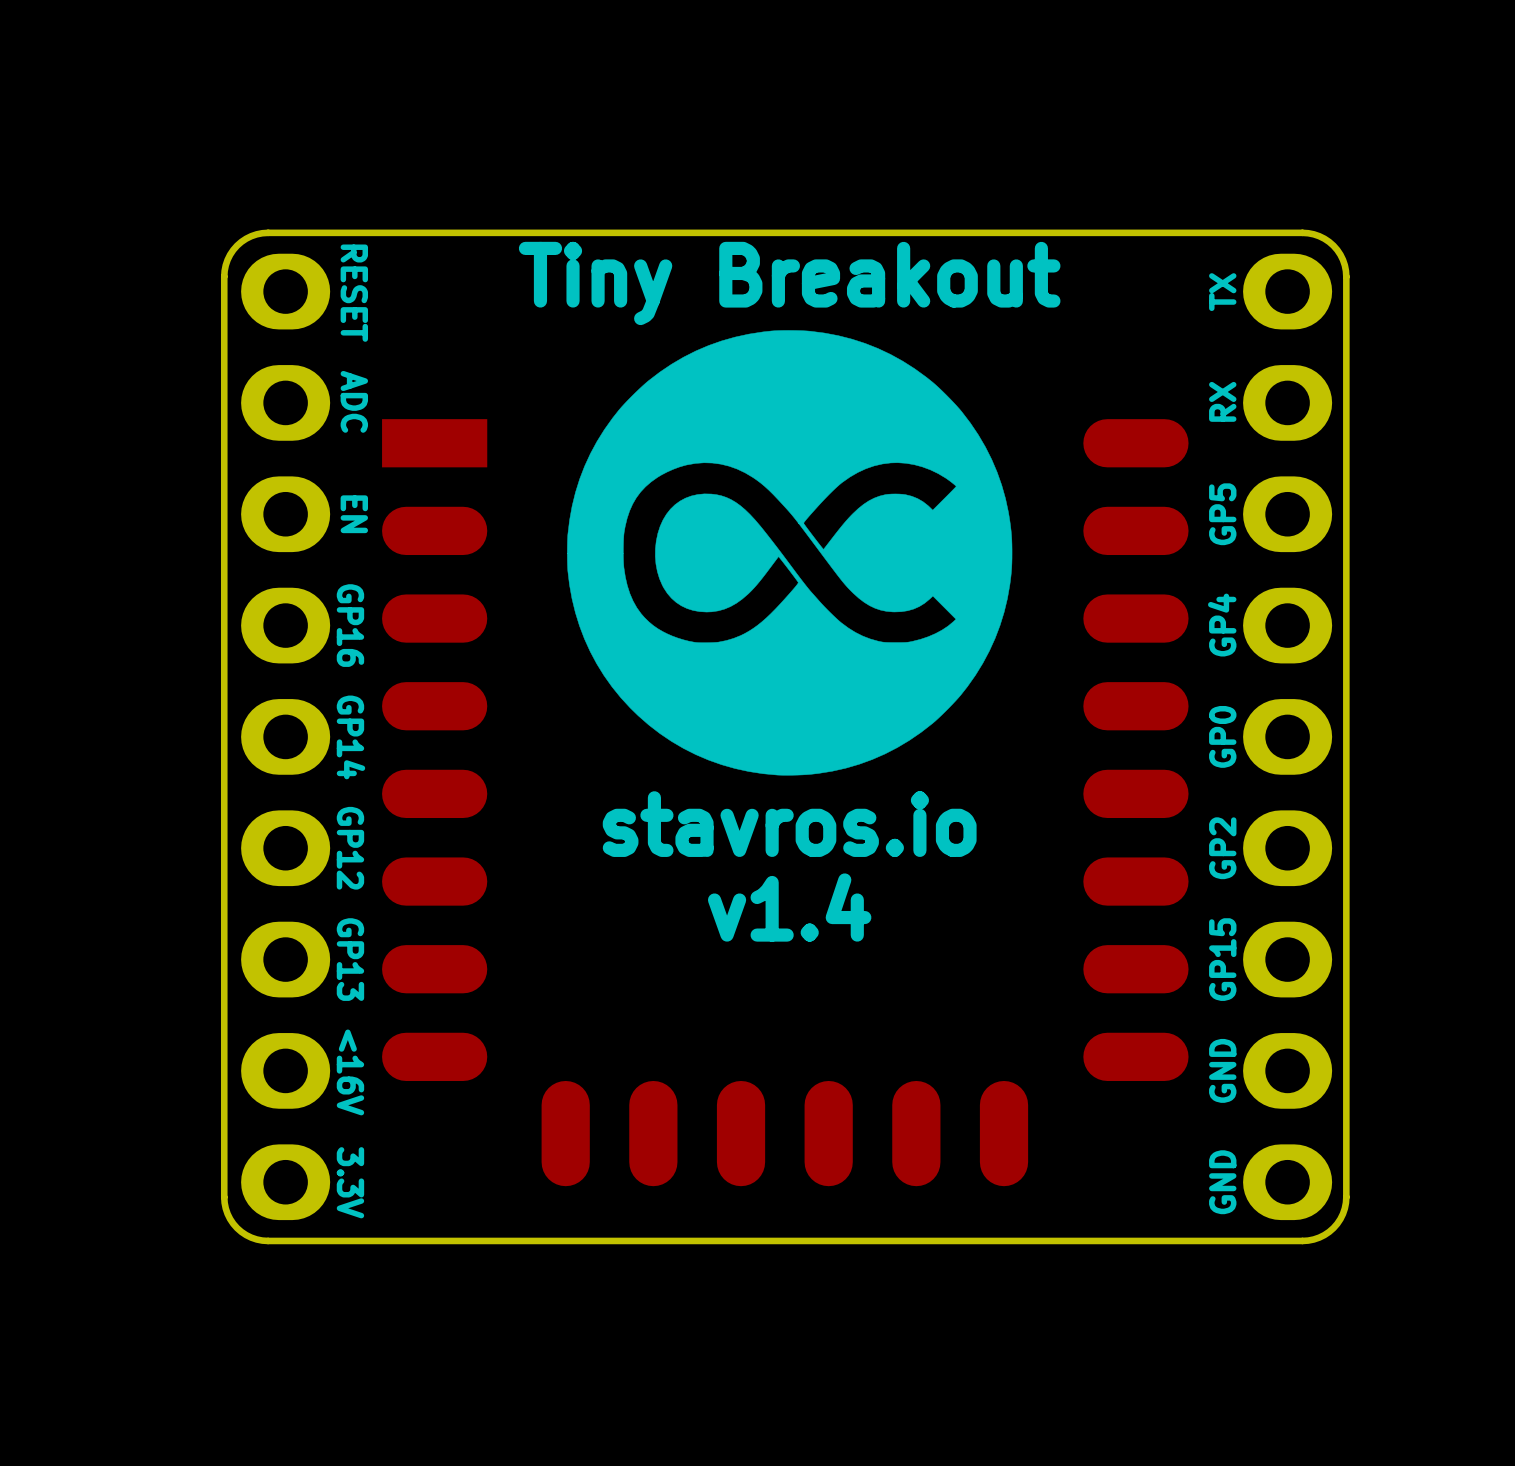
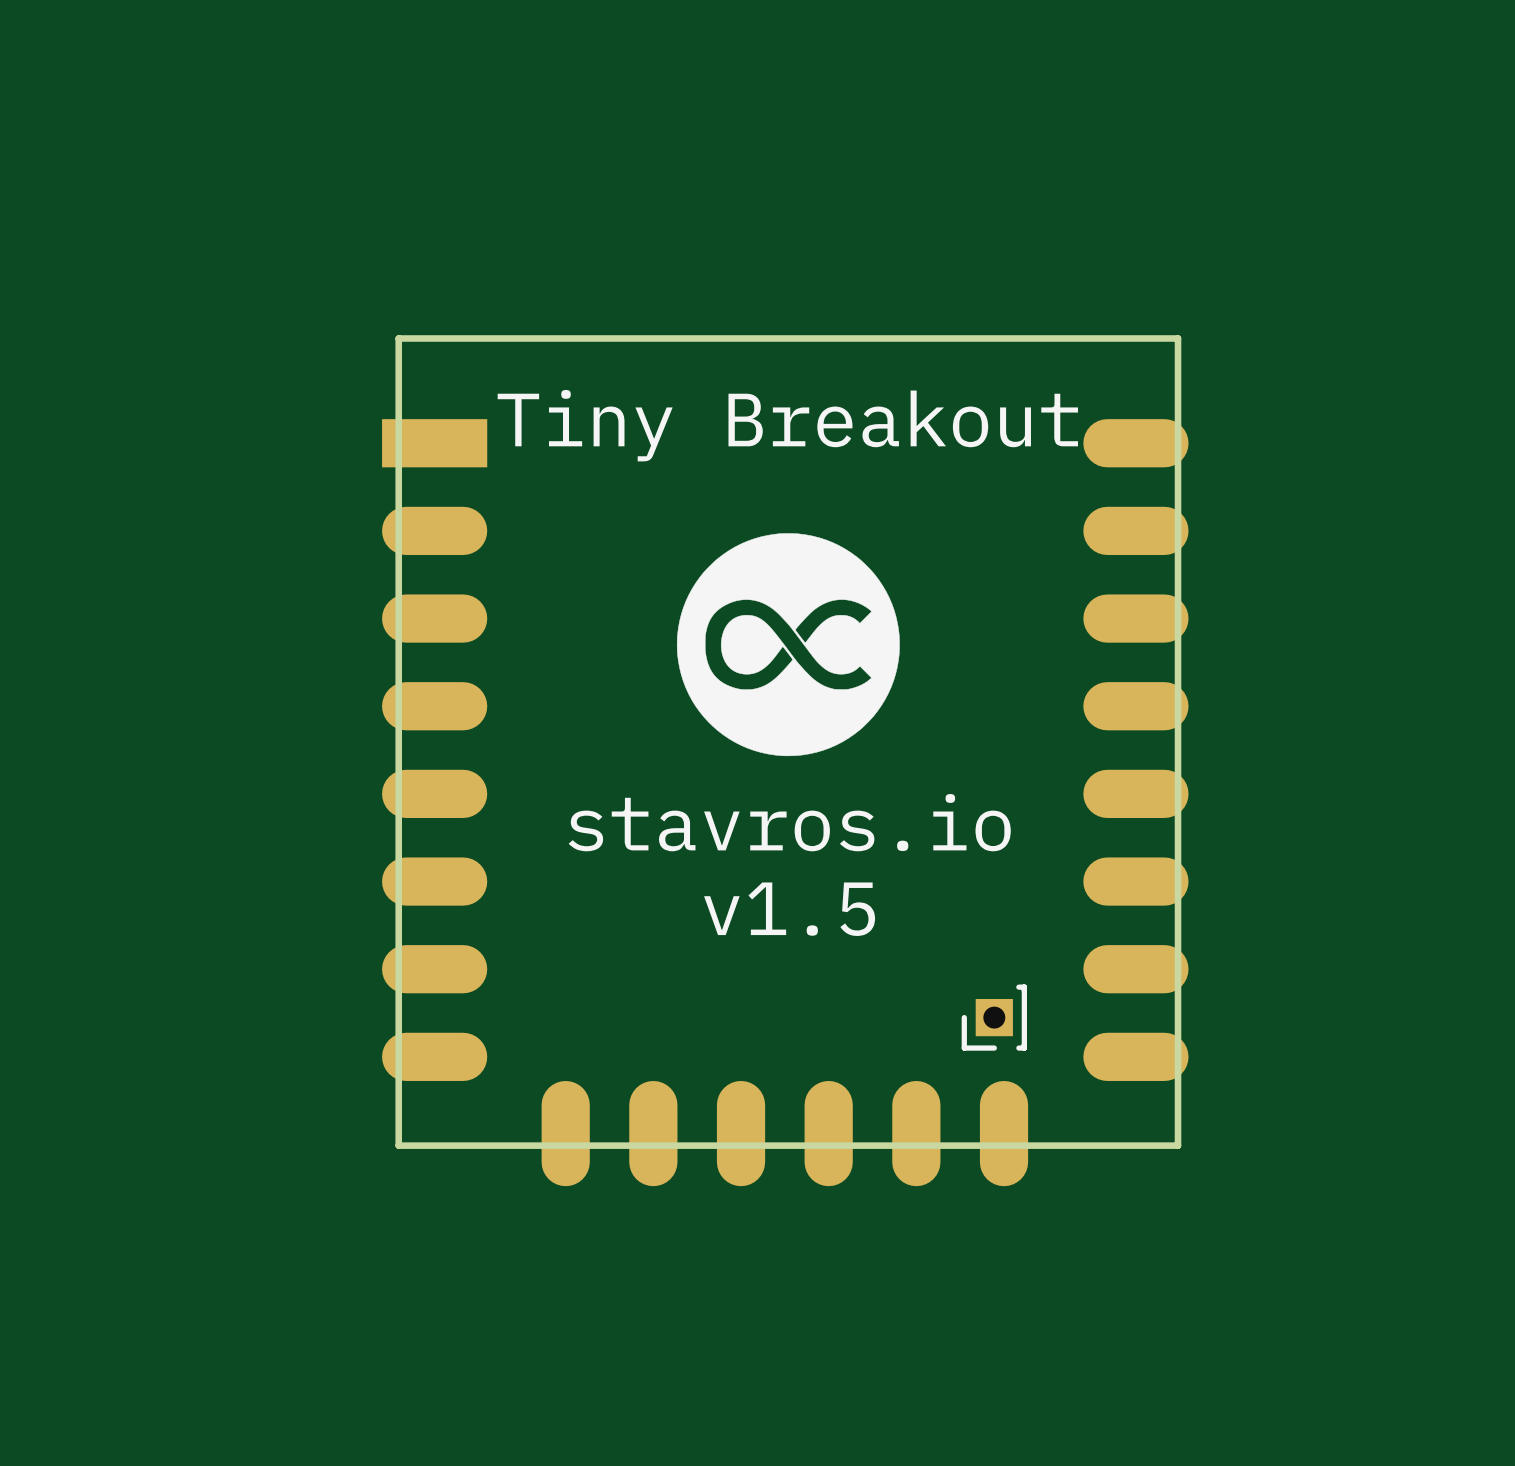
board edge: (268, 232) (1302, 232) (1319, 236) (1333, 245) (1342, 259) (1346, 276) (1346, 1197) (1342, 1213) (1333, 1228) (1319, 1237) (1302, 1240) (268, 1240) (251, 1237) (237, 1228) (227, 1213) (224, 1197) (224, 276) (227, 259) (237, 245) (251, 236) (268, 232) -> (398, 338) (398, 1145) (1178, 1145) (1178, 338) (398, 338)
text position: Tiny Breakout (789, 283) -> Tiny Breakout (787, 425)
text: TX (1222, 292) -> none
text: RESET (354, 293) -> none
drawing: [567, 330, 1013, 776] -> none
text: ADC (354, 401) -> none
text: RX (1222, 401) -> none
text: EN (354, 514) -> none
text: GP5 (1222, 514) -> none
drawing: none -> [676, 533, 900, 757]
text: GP16 (350, 625) -> none
text: GP4 (1222, 625) -> none
part: (285, 736) -> none
text: GP0 (1222, 736) -> none
part: (1287, 736) -> none
text: GP14 (350, 737) -> none
text: GP12 (350, 848) -> none
text: GP2 (1222, 848) -> none
text: v1.4 (789, 907) -> v1.5 (789, 909)
text: GP13 (350, 959) -> none
text: GP15 (1222, 959) -> none
part: none -> (994, 1017)
text: GND (1222, 1070) -> none
text: <16V (350, 1072) -> none
text: 3.3V (350, 1182) -> none
text: GND (1222, 1182) -> none

